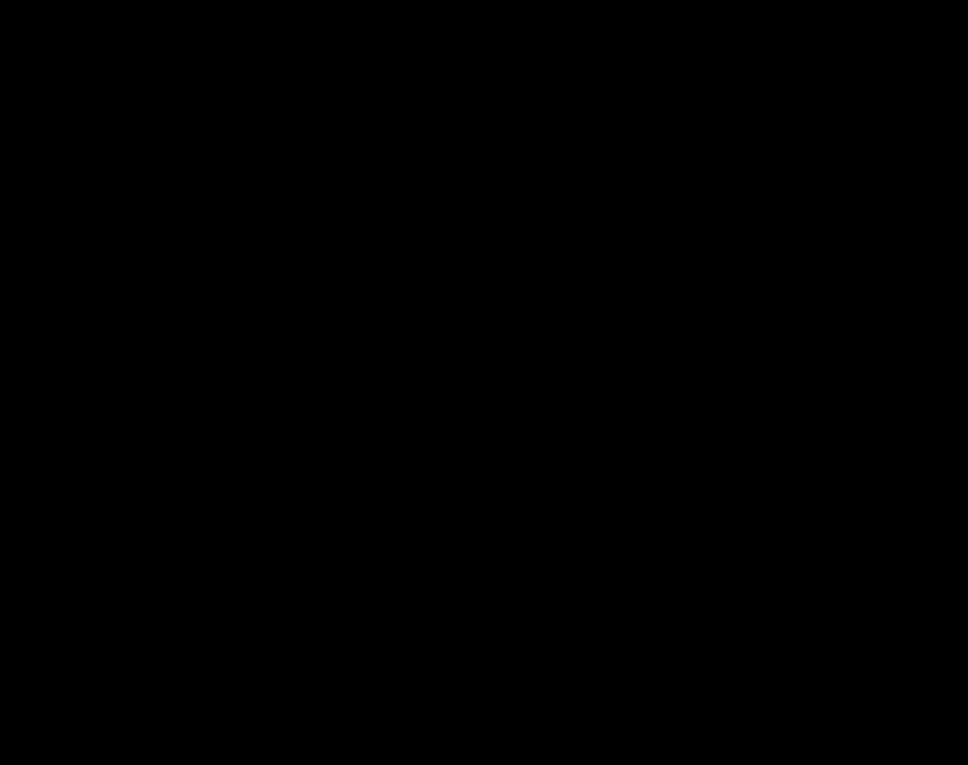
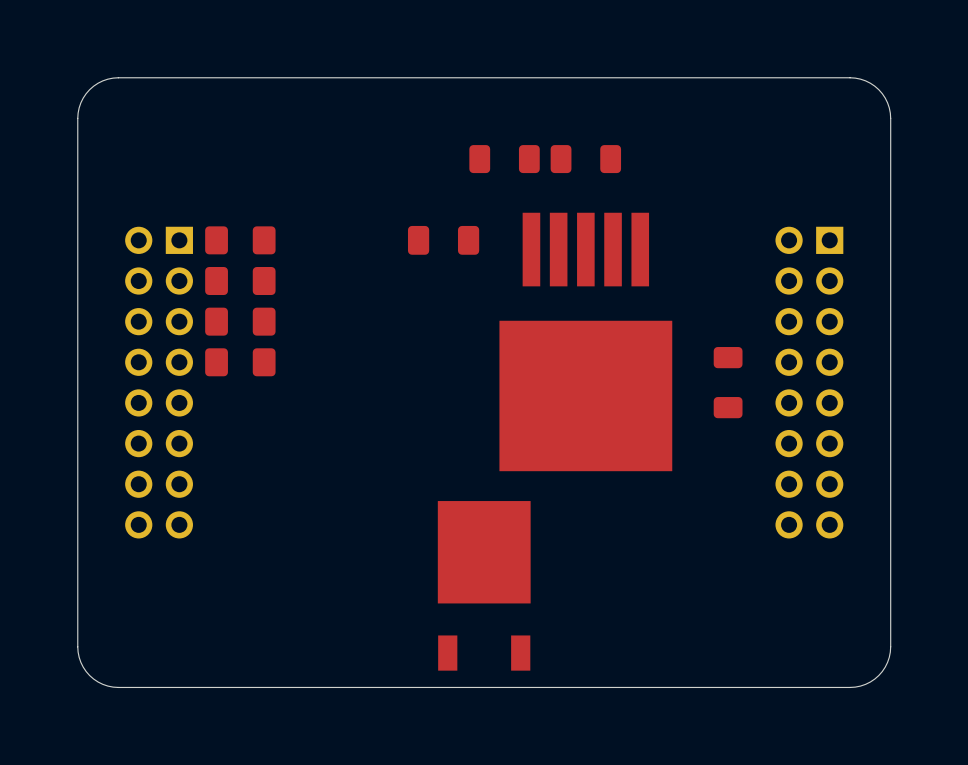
board edge: none -> (850, 77) (118, 77) (107, 79) (93, 86) (83, 98) (77, 118) (77, 646) (80, 662) (86, 671) (98, 682) (118, 687) (850, 687) (860, 686) (874, 679) (887, 662) (890, 646) (890, 118) (887, 102) (878, 89) (865, 80) (850, 77)
part: none -> (504, 159)
part: none -> (585, 159)
part: none -> (240, 240)
part: none -> (443, 240)
part: none -> (240, 281)
part: none -> (240, 321)
part: none -> (585, 341)
part: none -> (240, 362)
part: none -> (159, 382)
part: none -> (728, 382)
part: none -> (809, 382)
part: none -> (484, 585)

